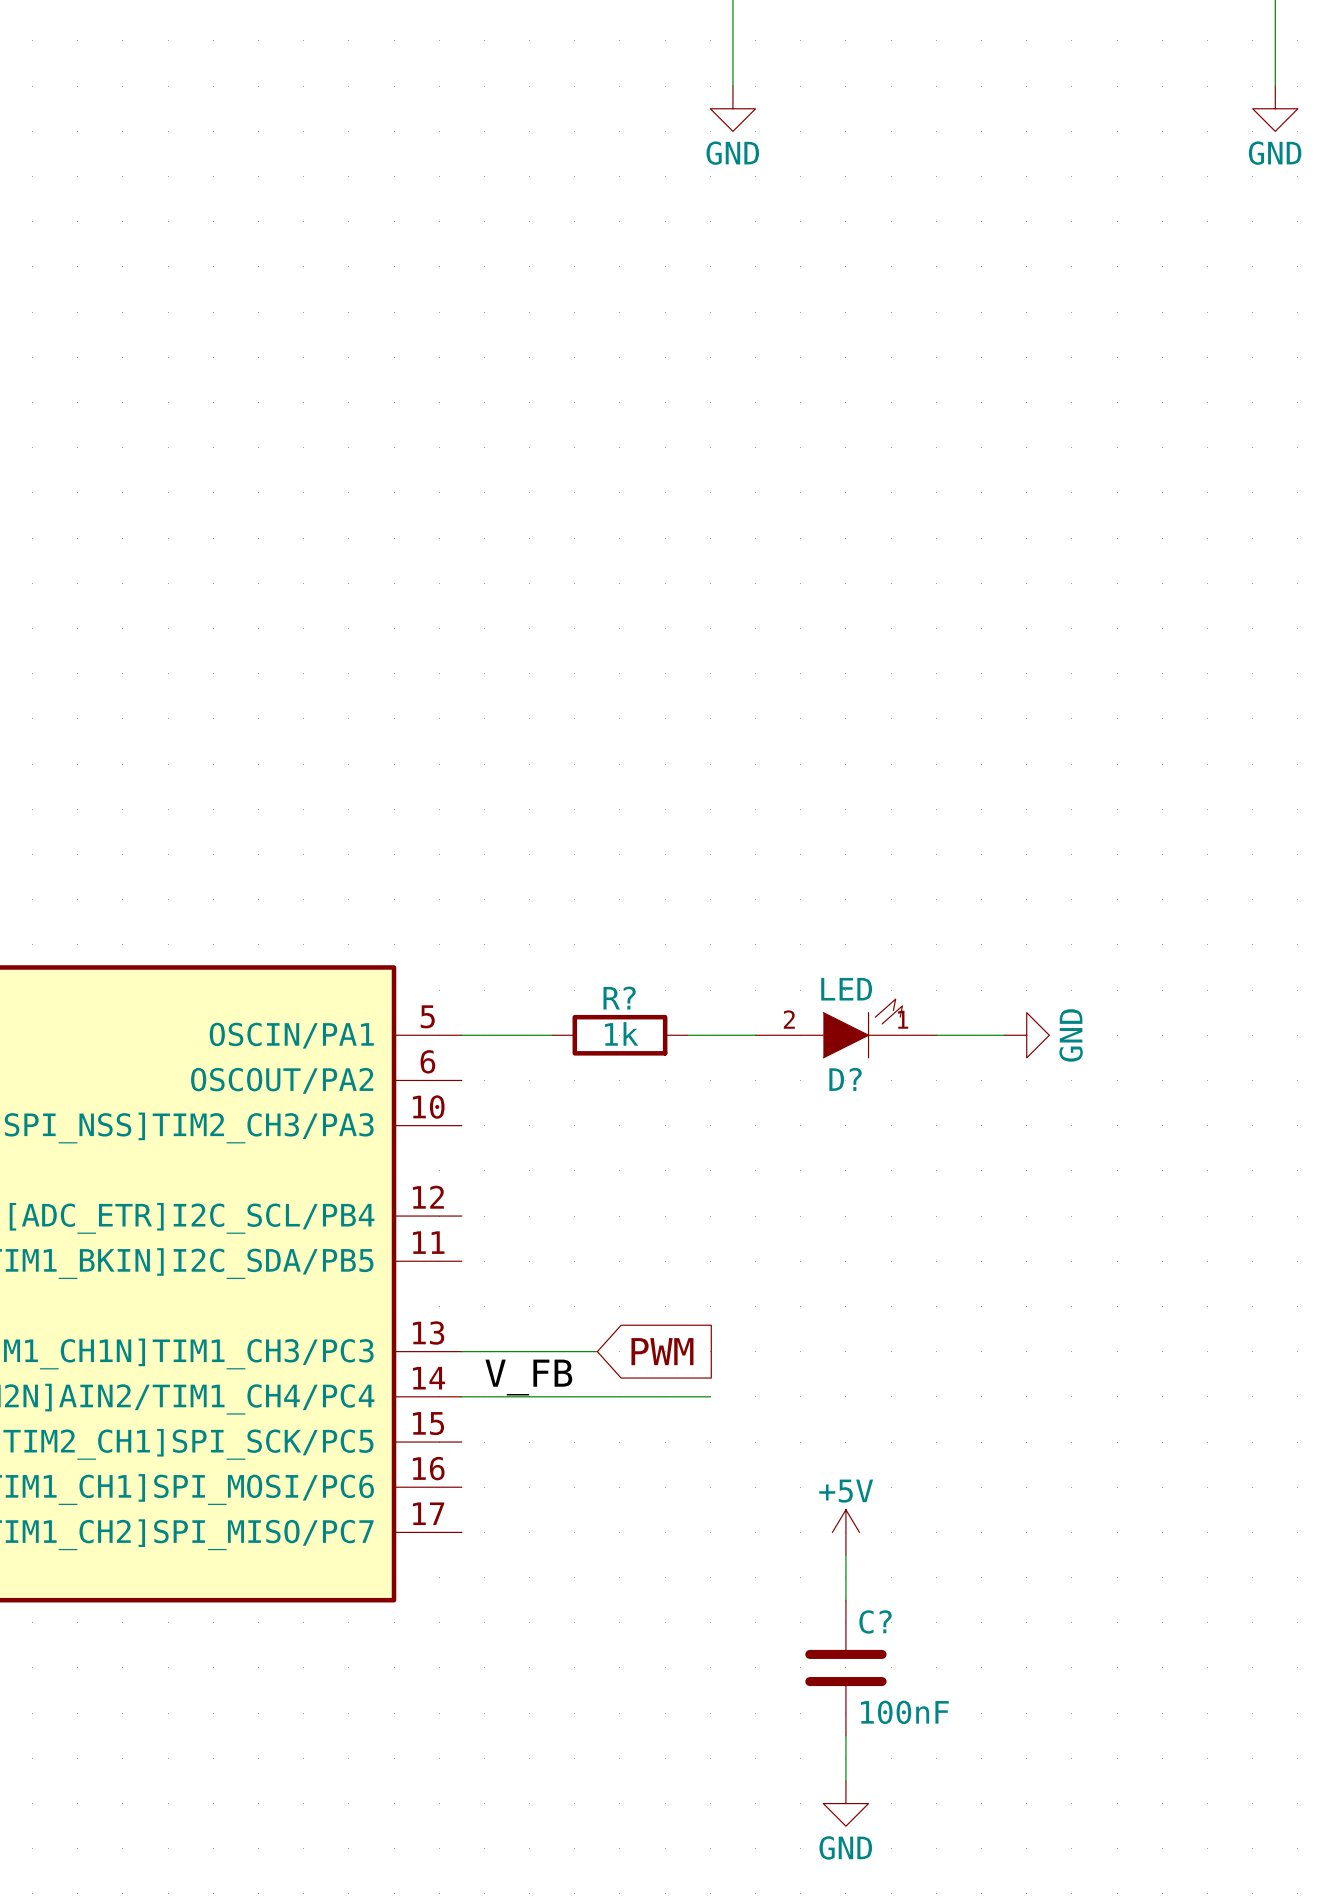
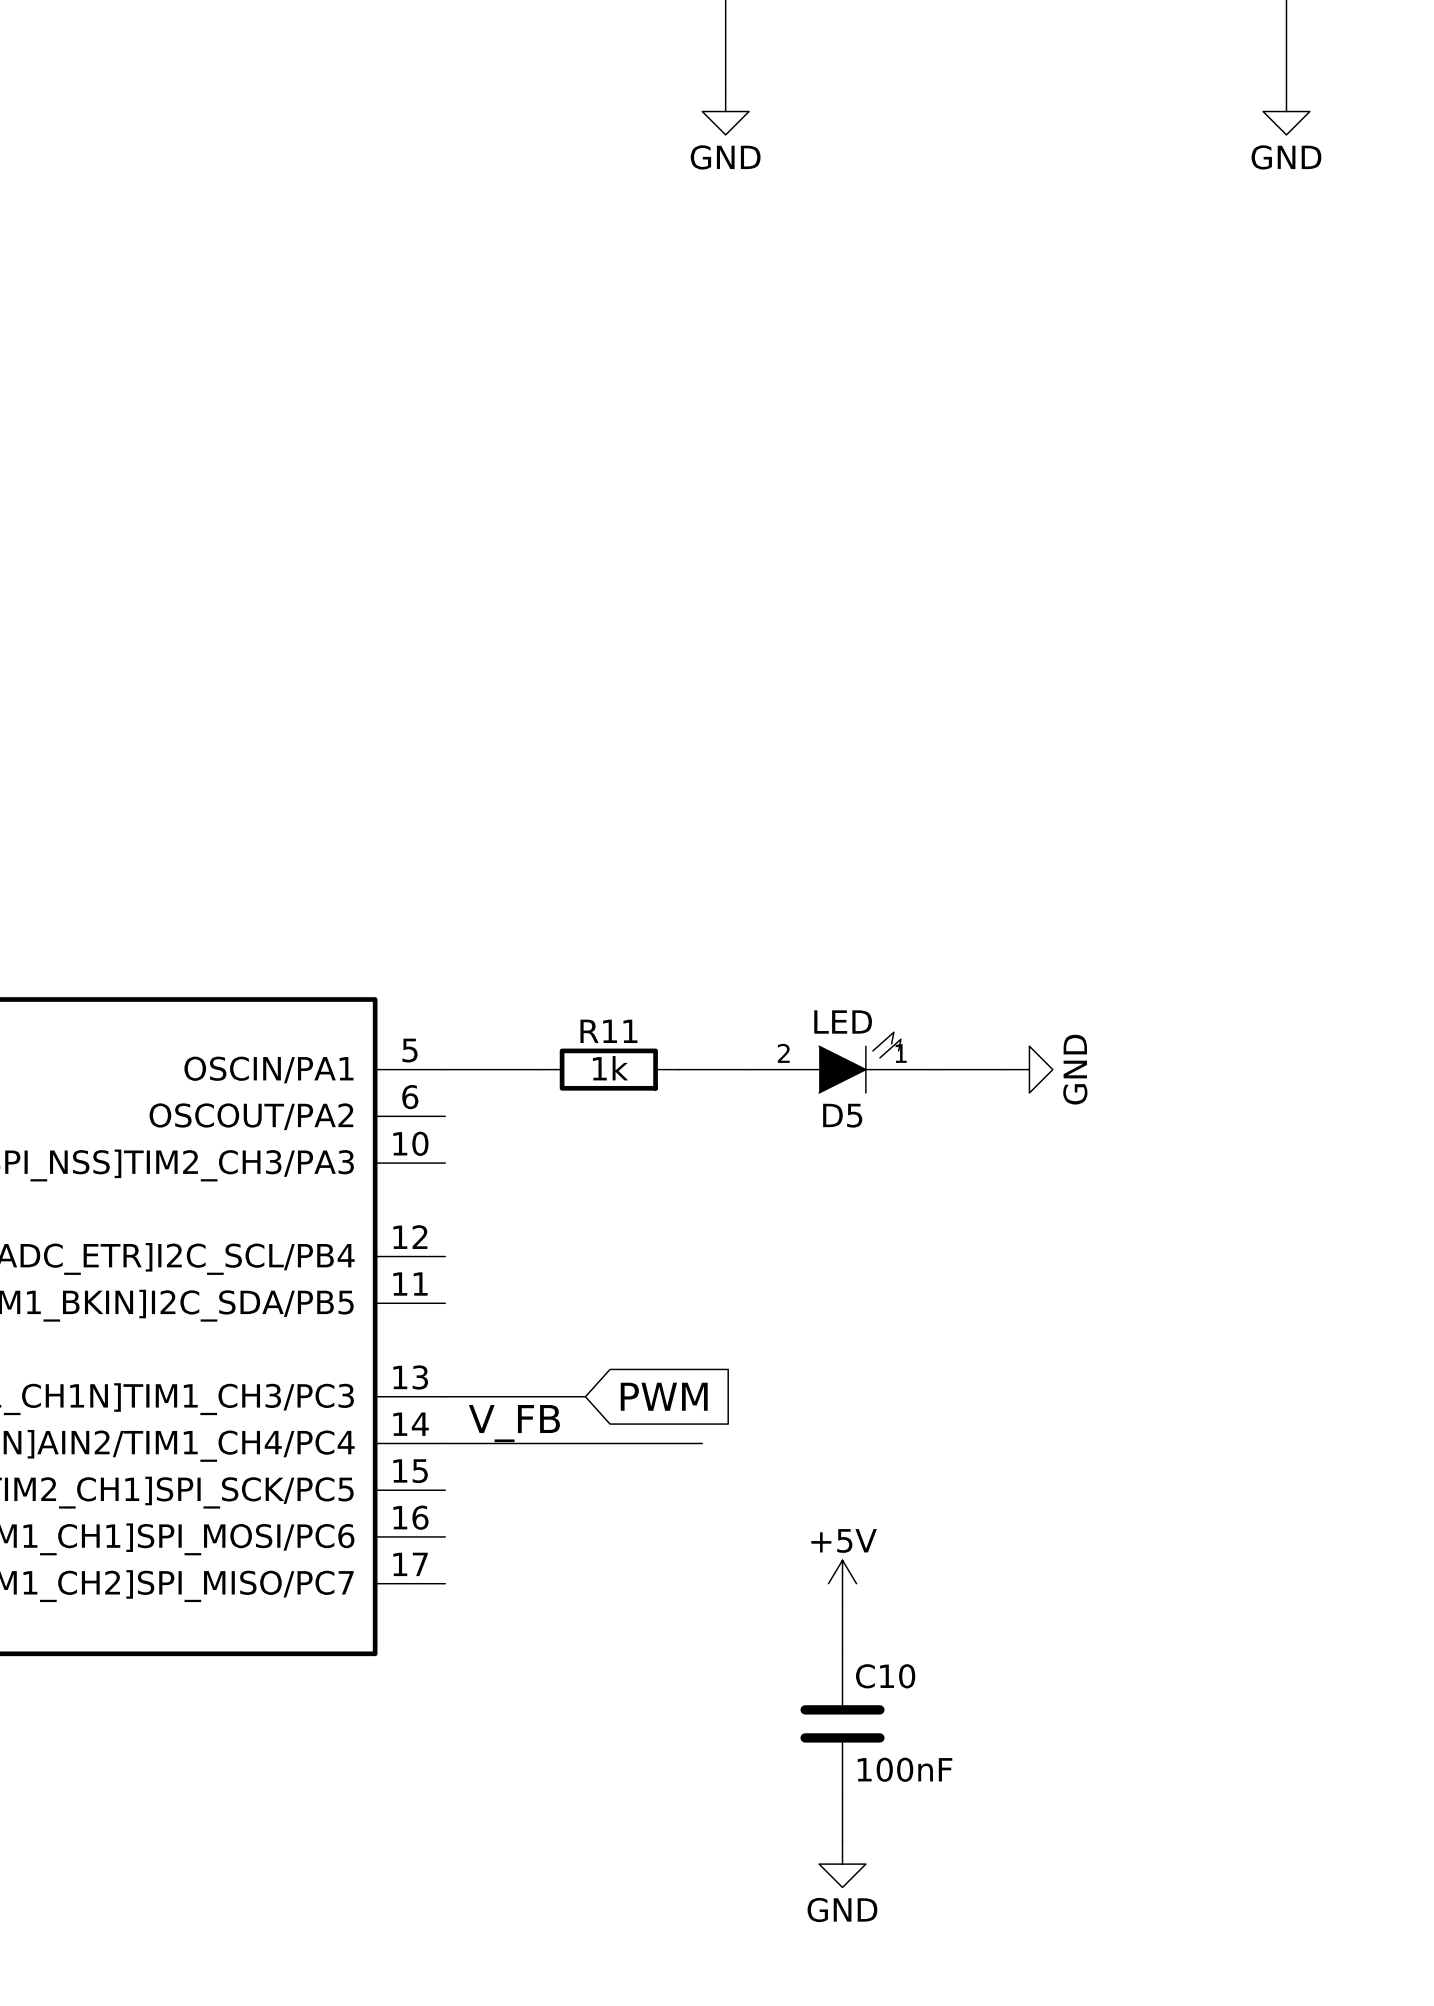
R? name: R? (619, 998) -> R11 (608, 1031)
D? name: D? (845, 1079) -> D5 (842, 1115)
C? name: C? (875, 1621) -> C10 (885, 1676)

